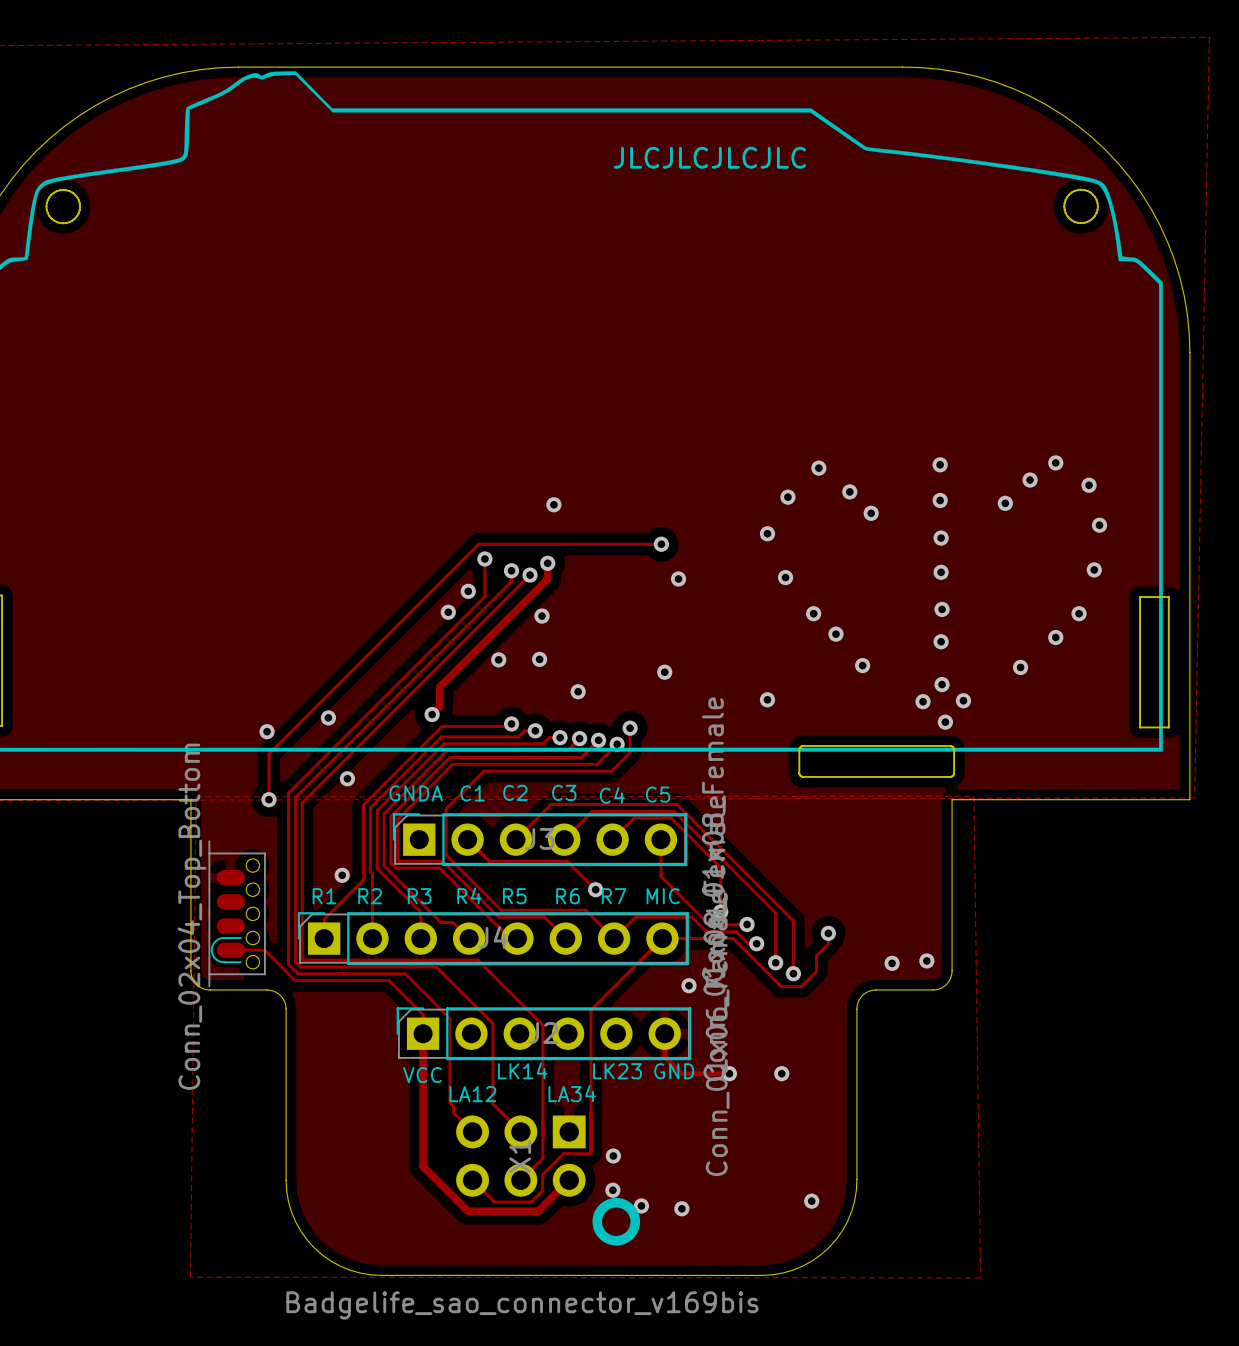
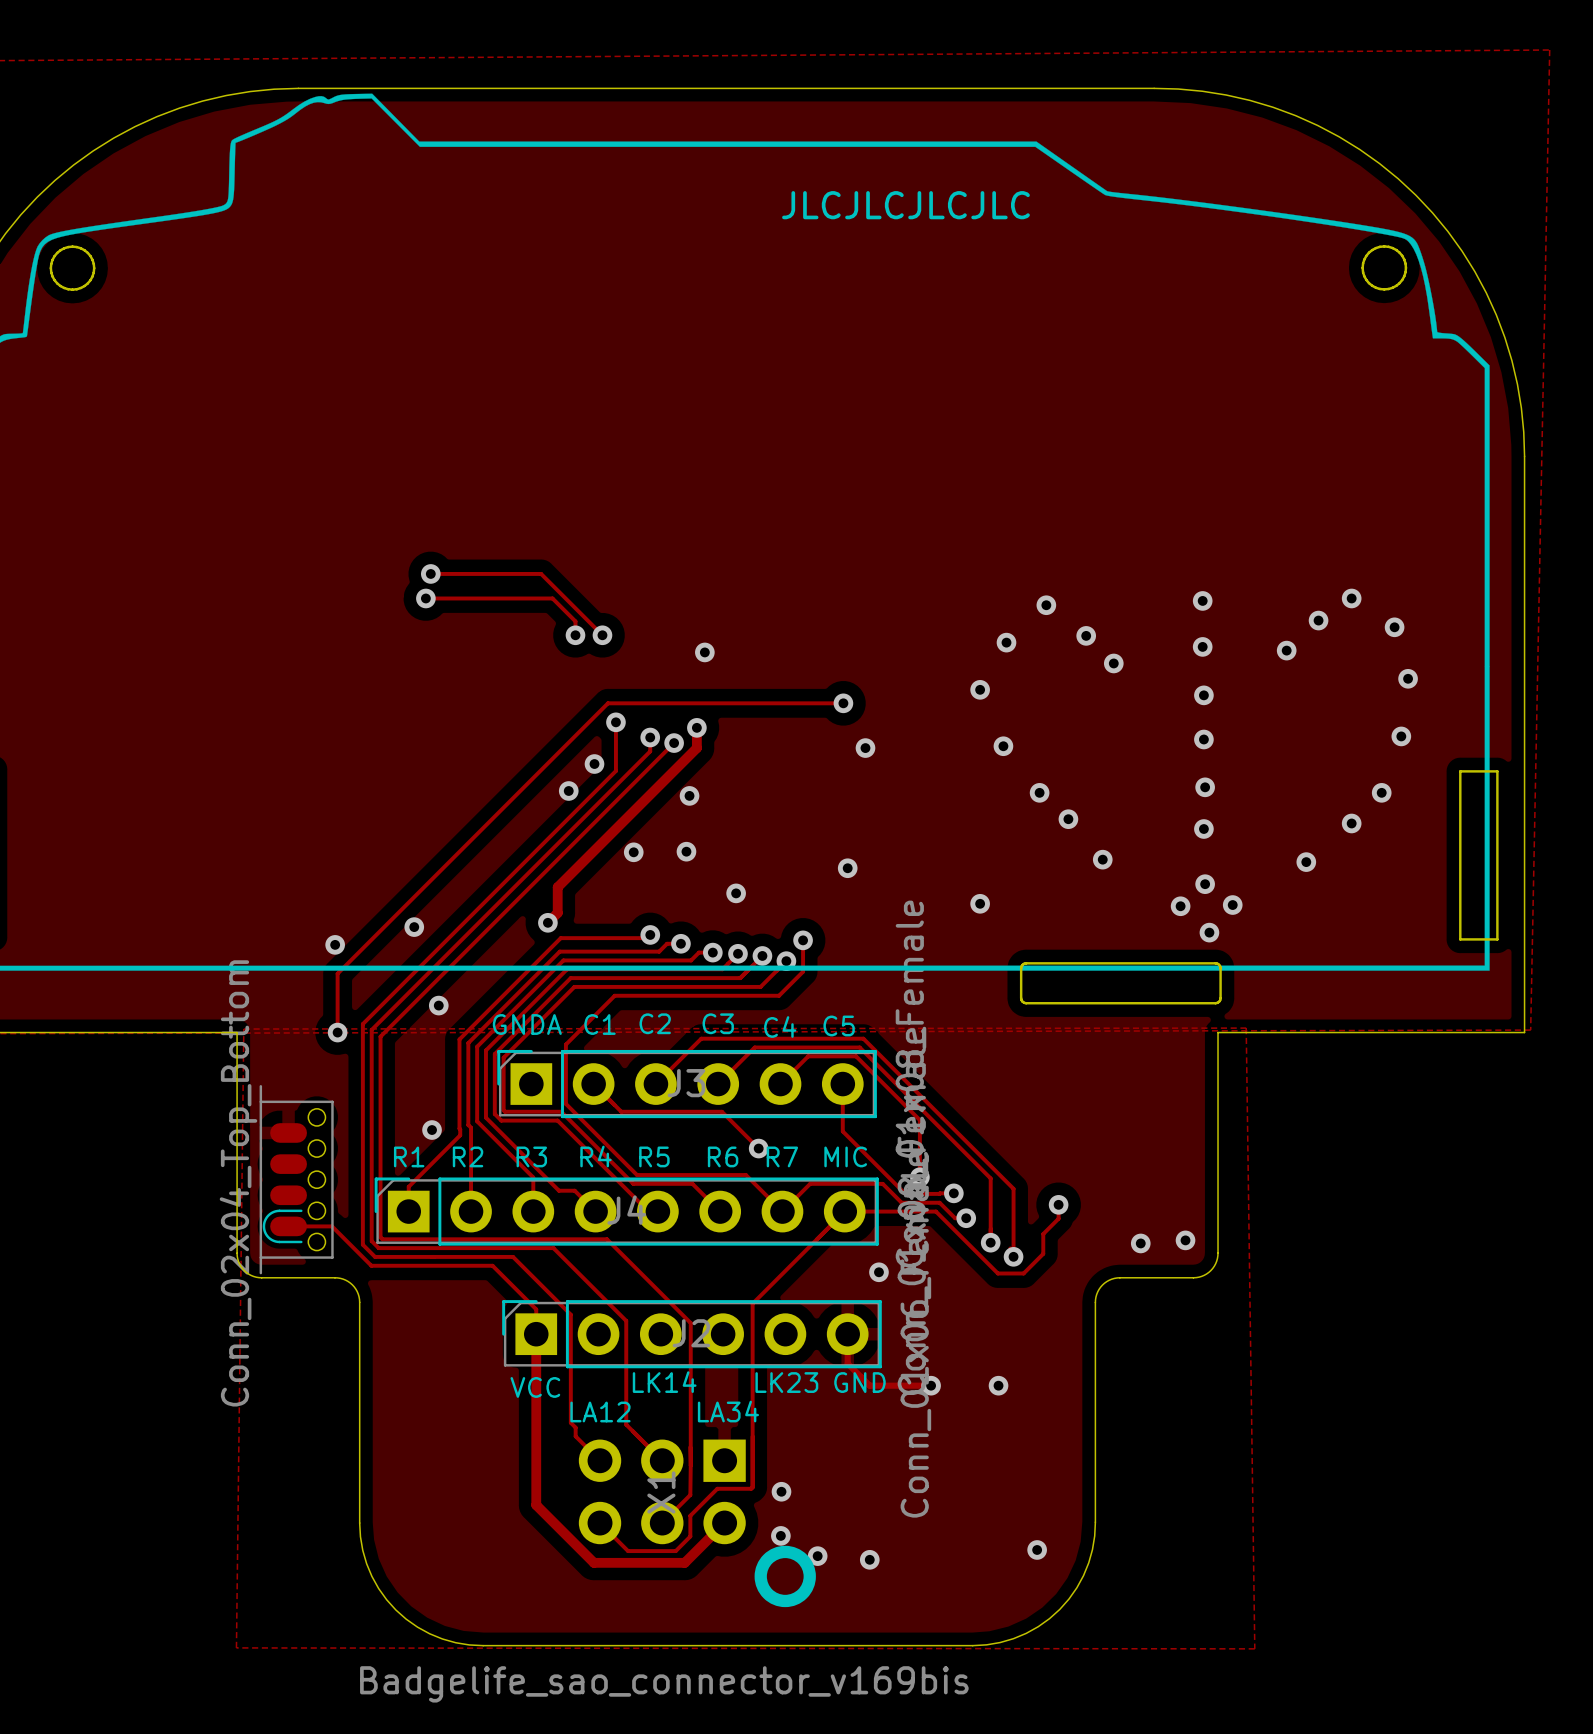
track: none -> (430, 573) (541, 573) (602, 635)
via: none -> (430, 573)
track: none -> (425, 598) (552, 598) (575, 621) (575, 635)
via: none -> (425, 598)
via: none -> (575, 635)
via: none -> (602, 635)

